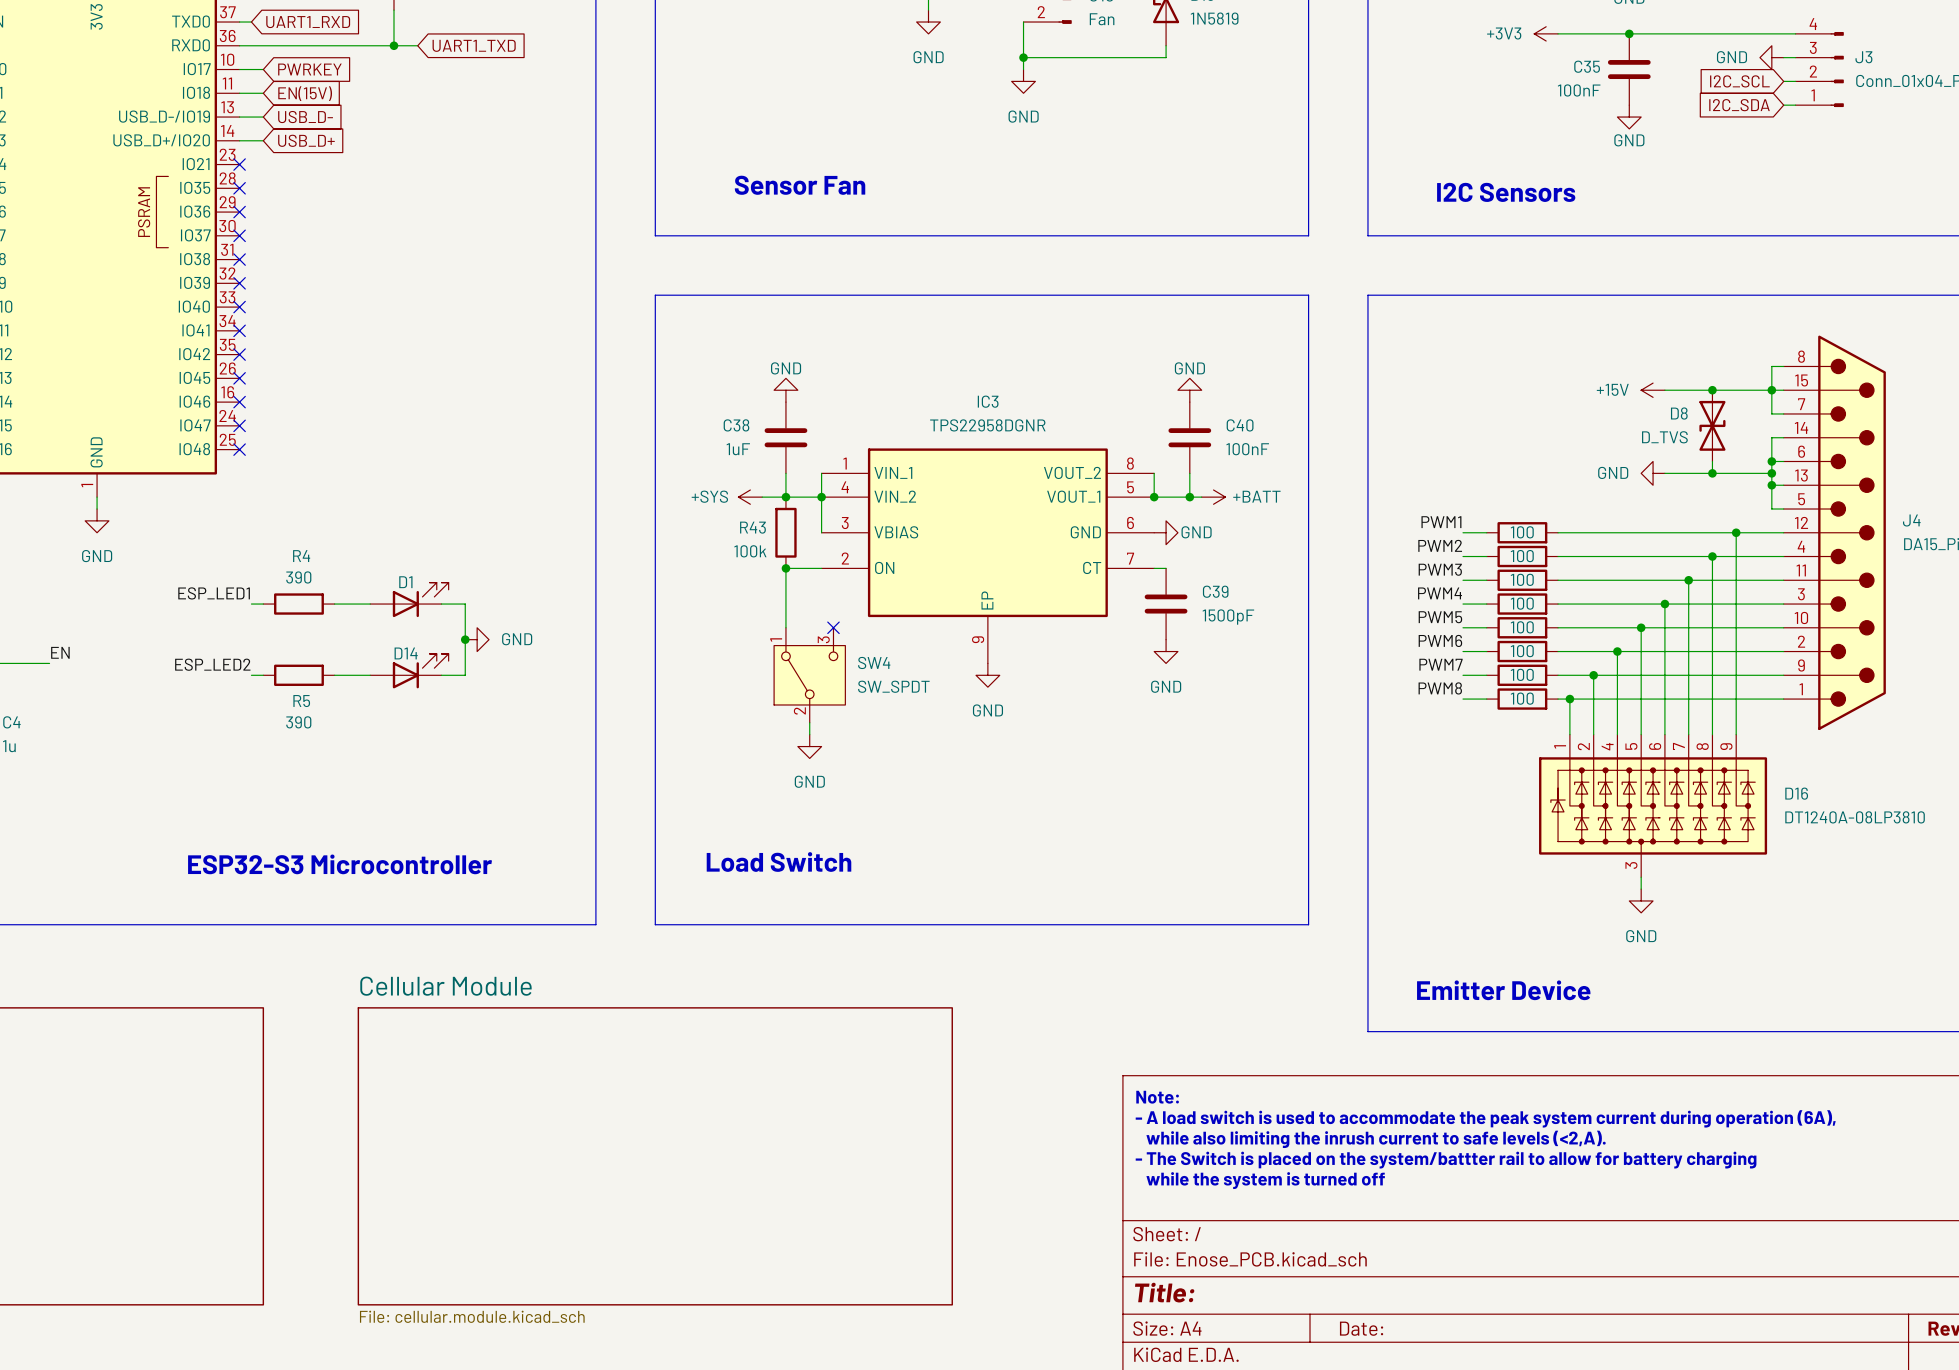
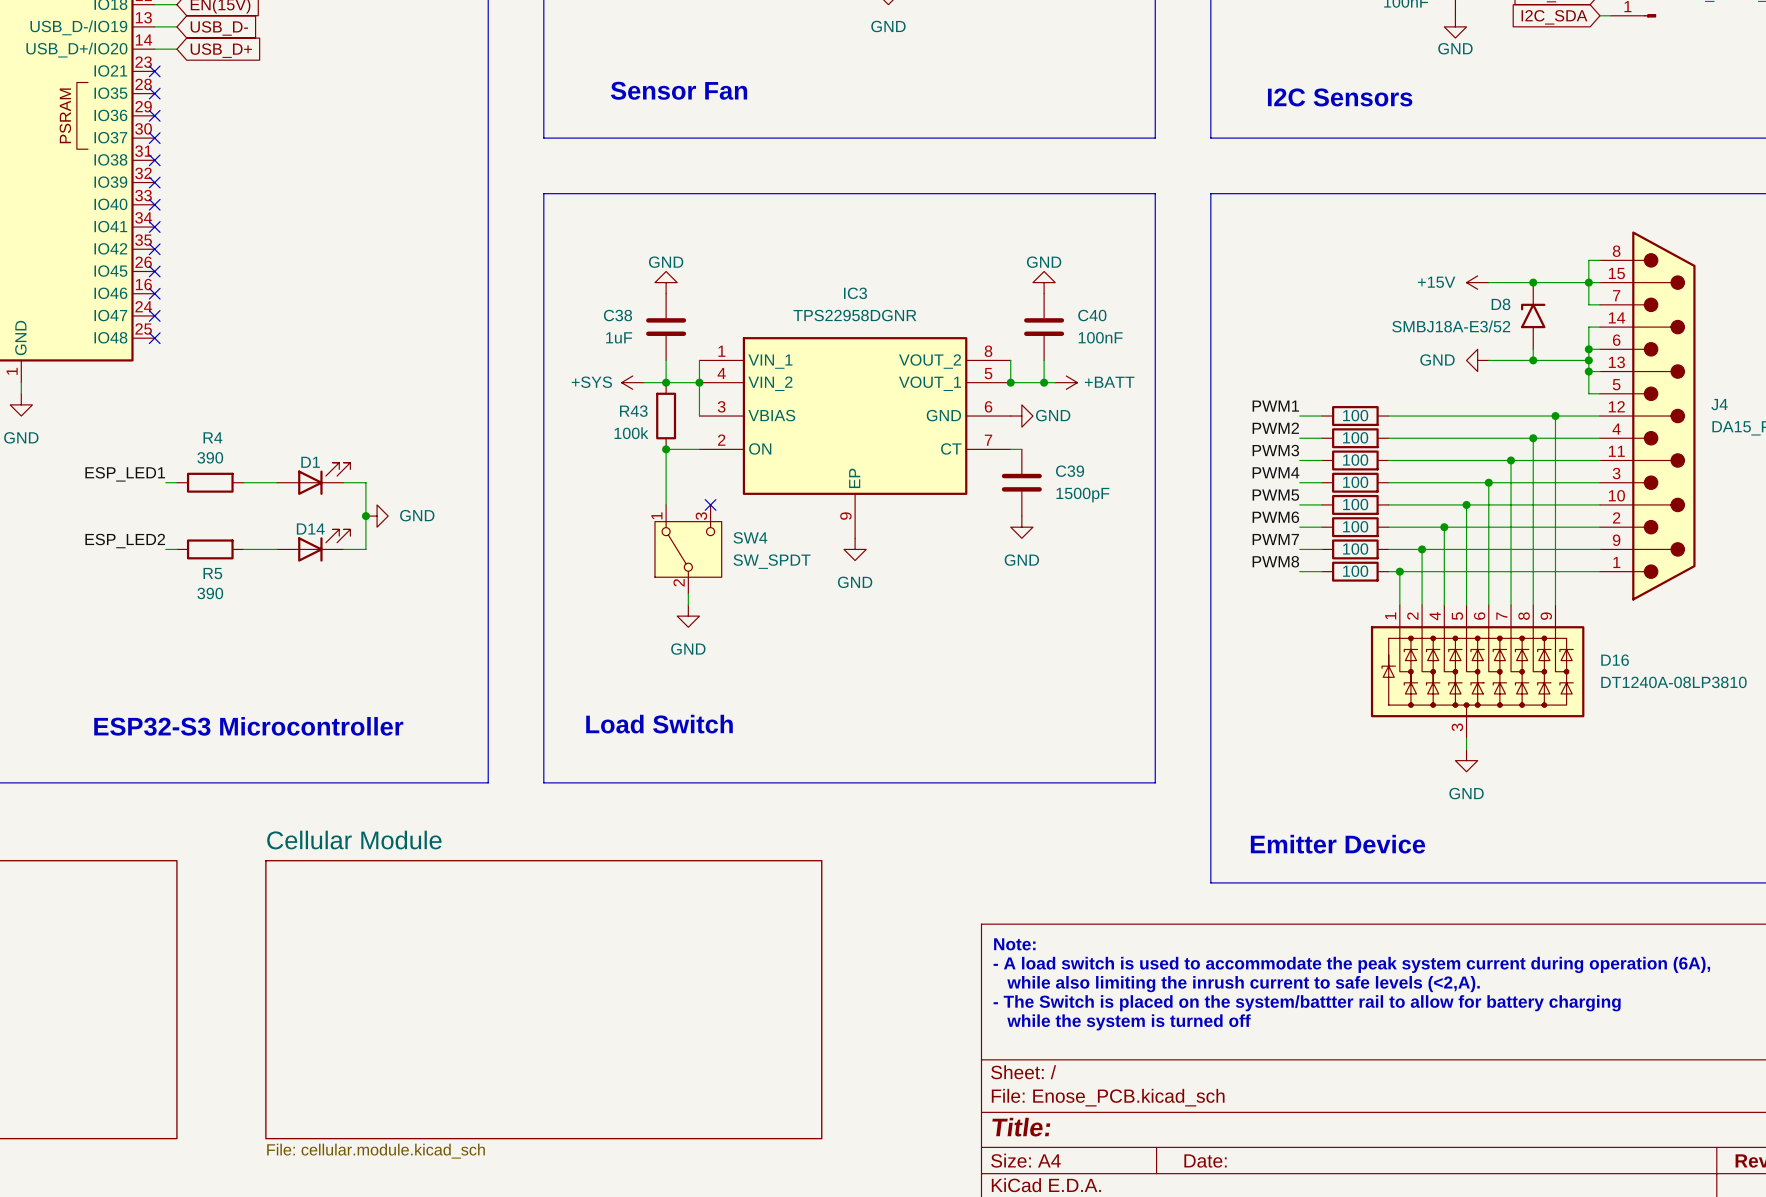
D8 symbol: [1699, 390, 1726, 462] -> [1521, 282, 1546, 350]
D8 value: D_TVS (1664, 437) -> SMBJ18A-E3/52 (1451, 326)

